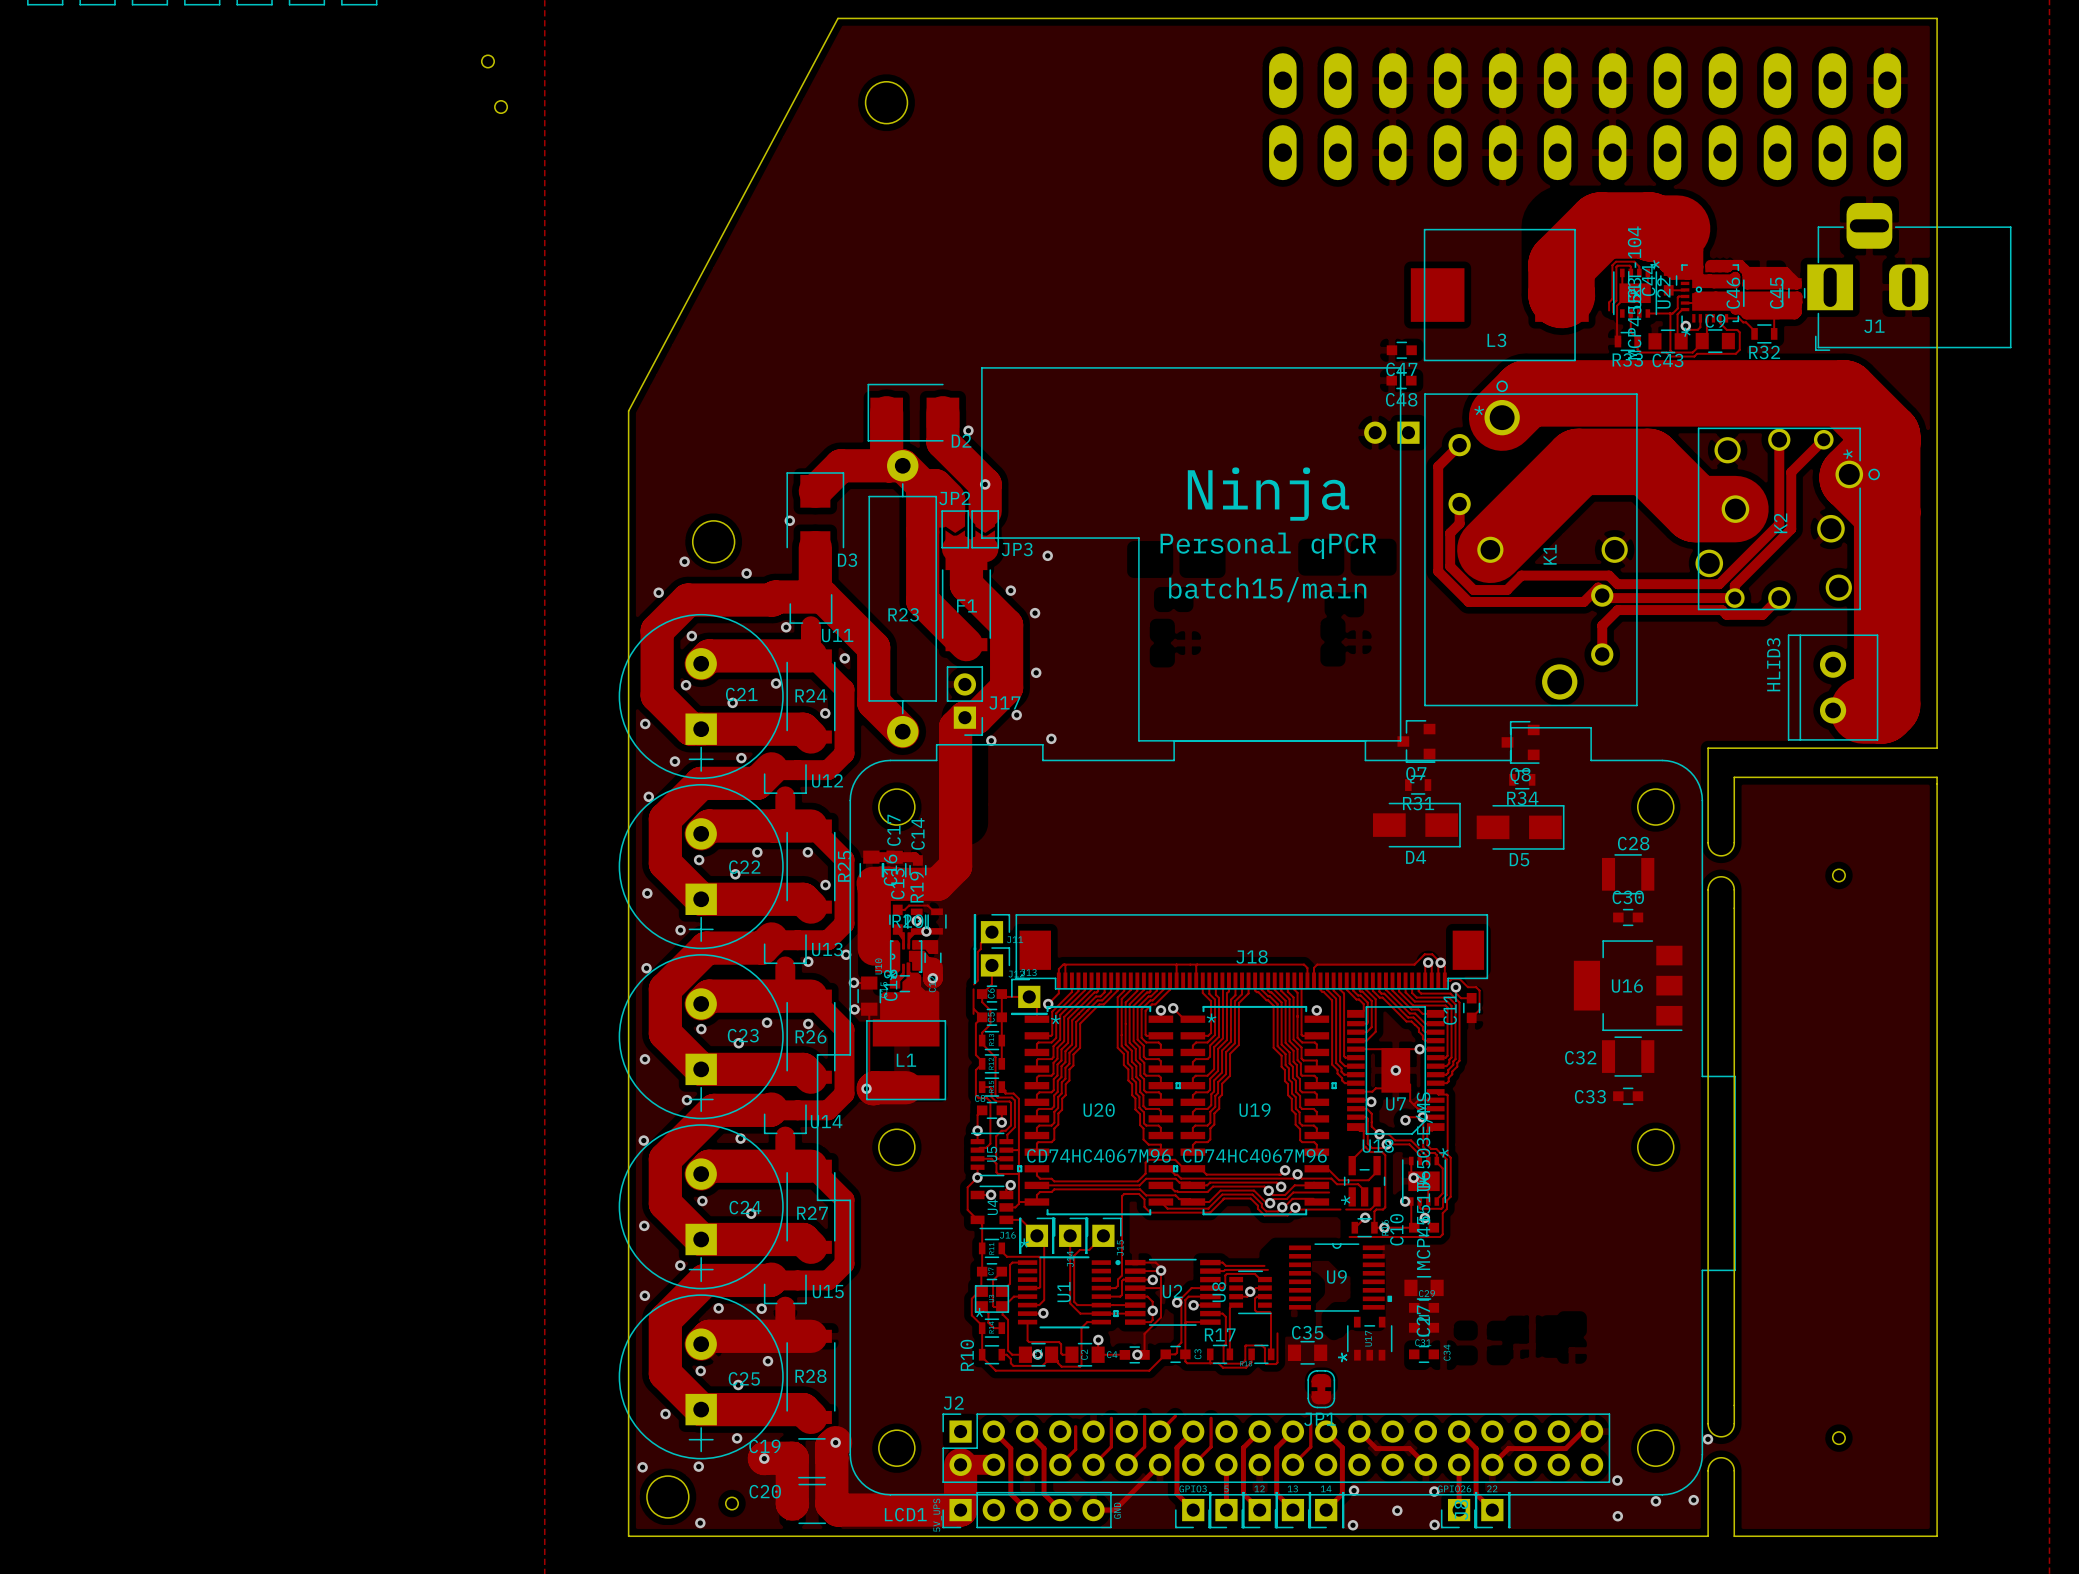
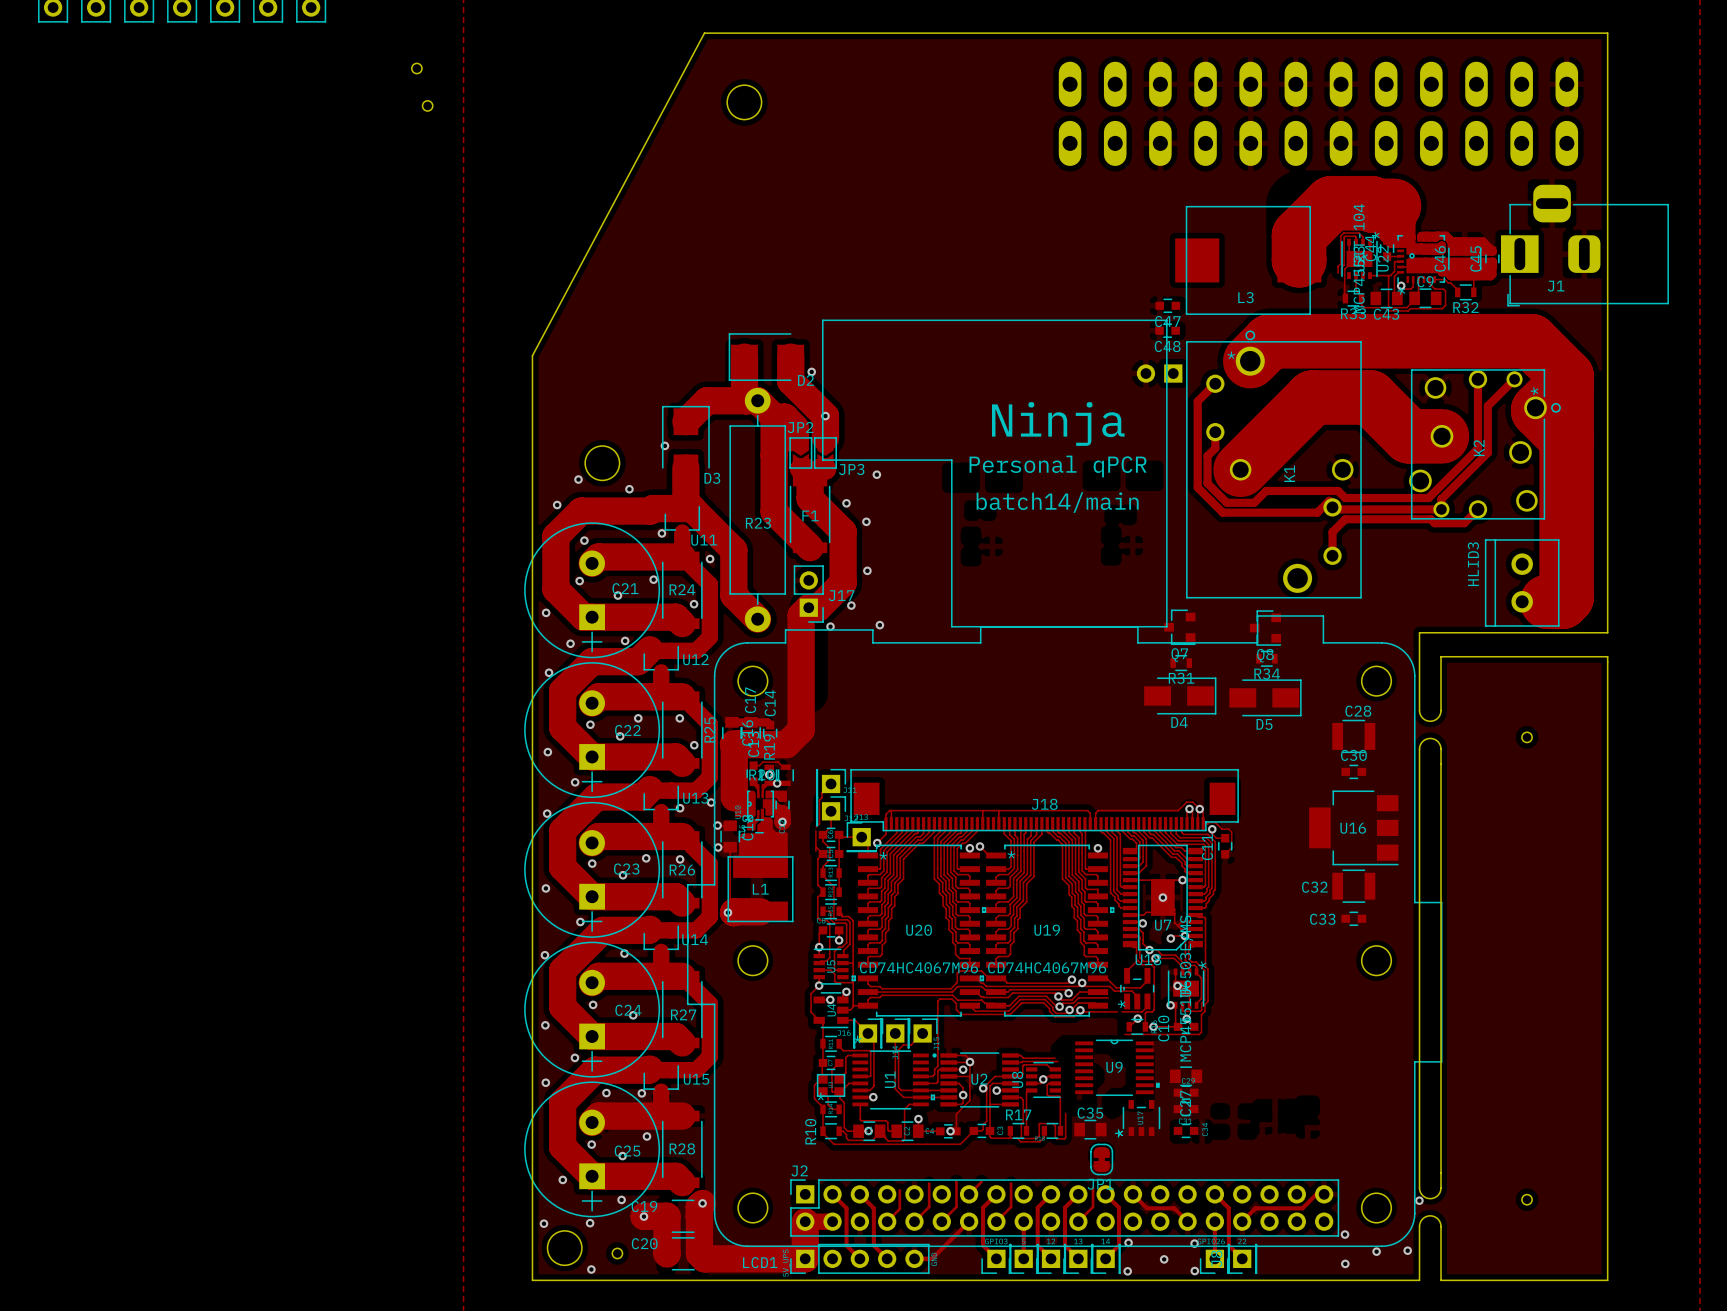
text: batch15/main (1267, 589) -> batch14/main (1057, 502)

